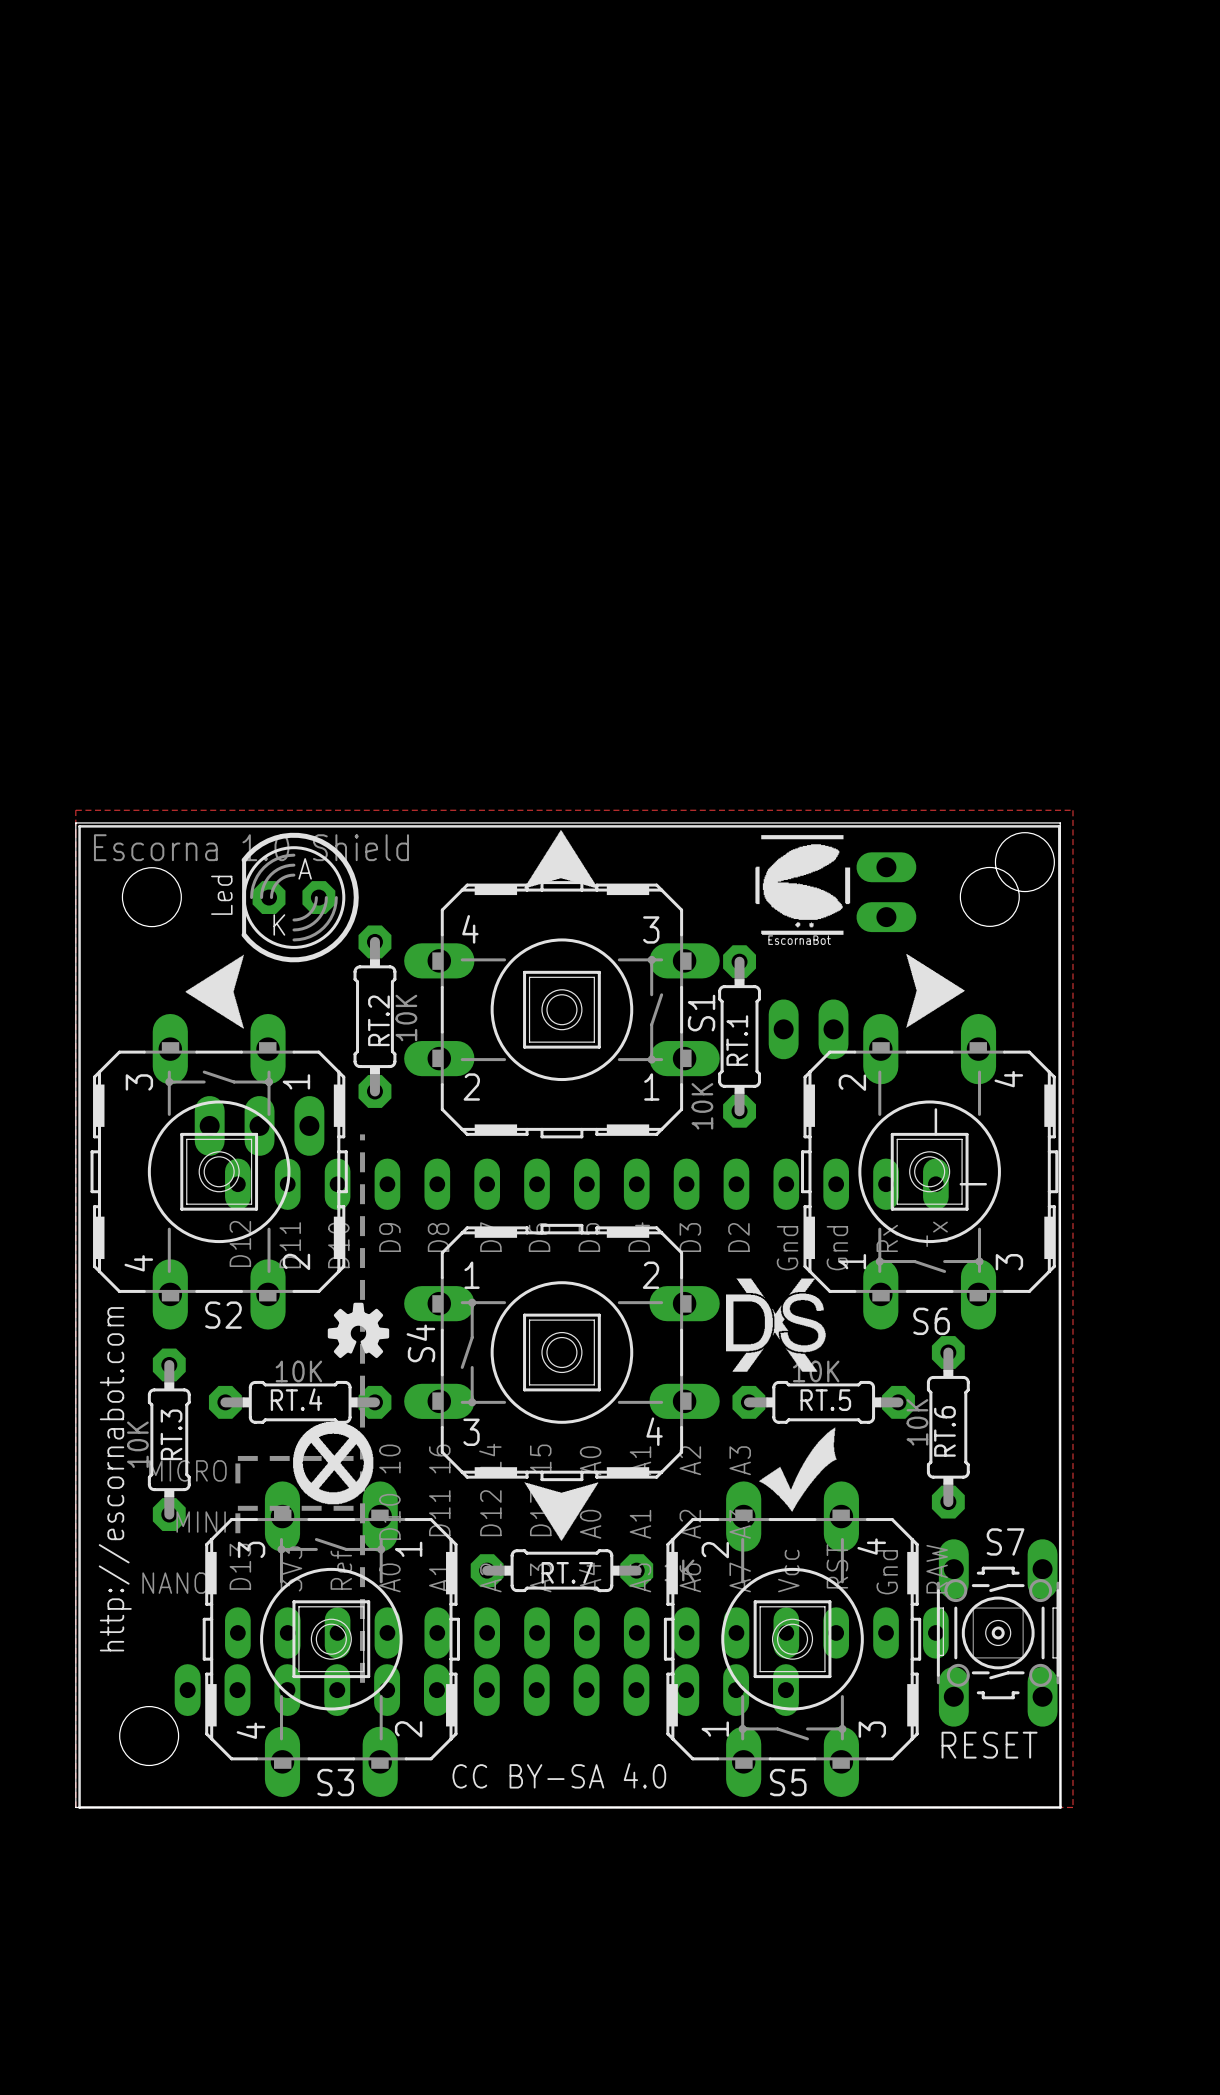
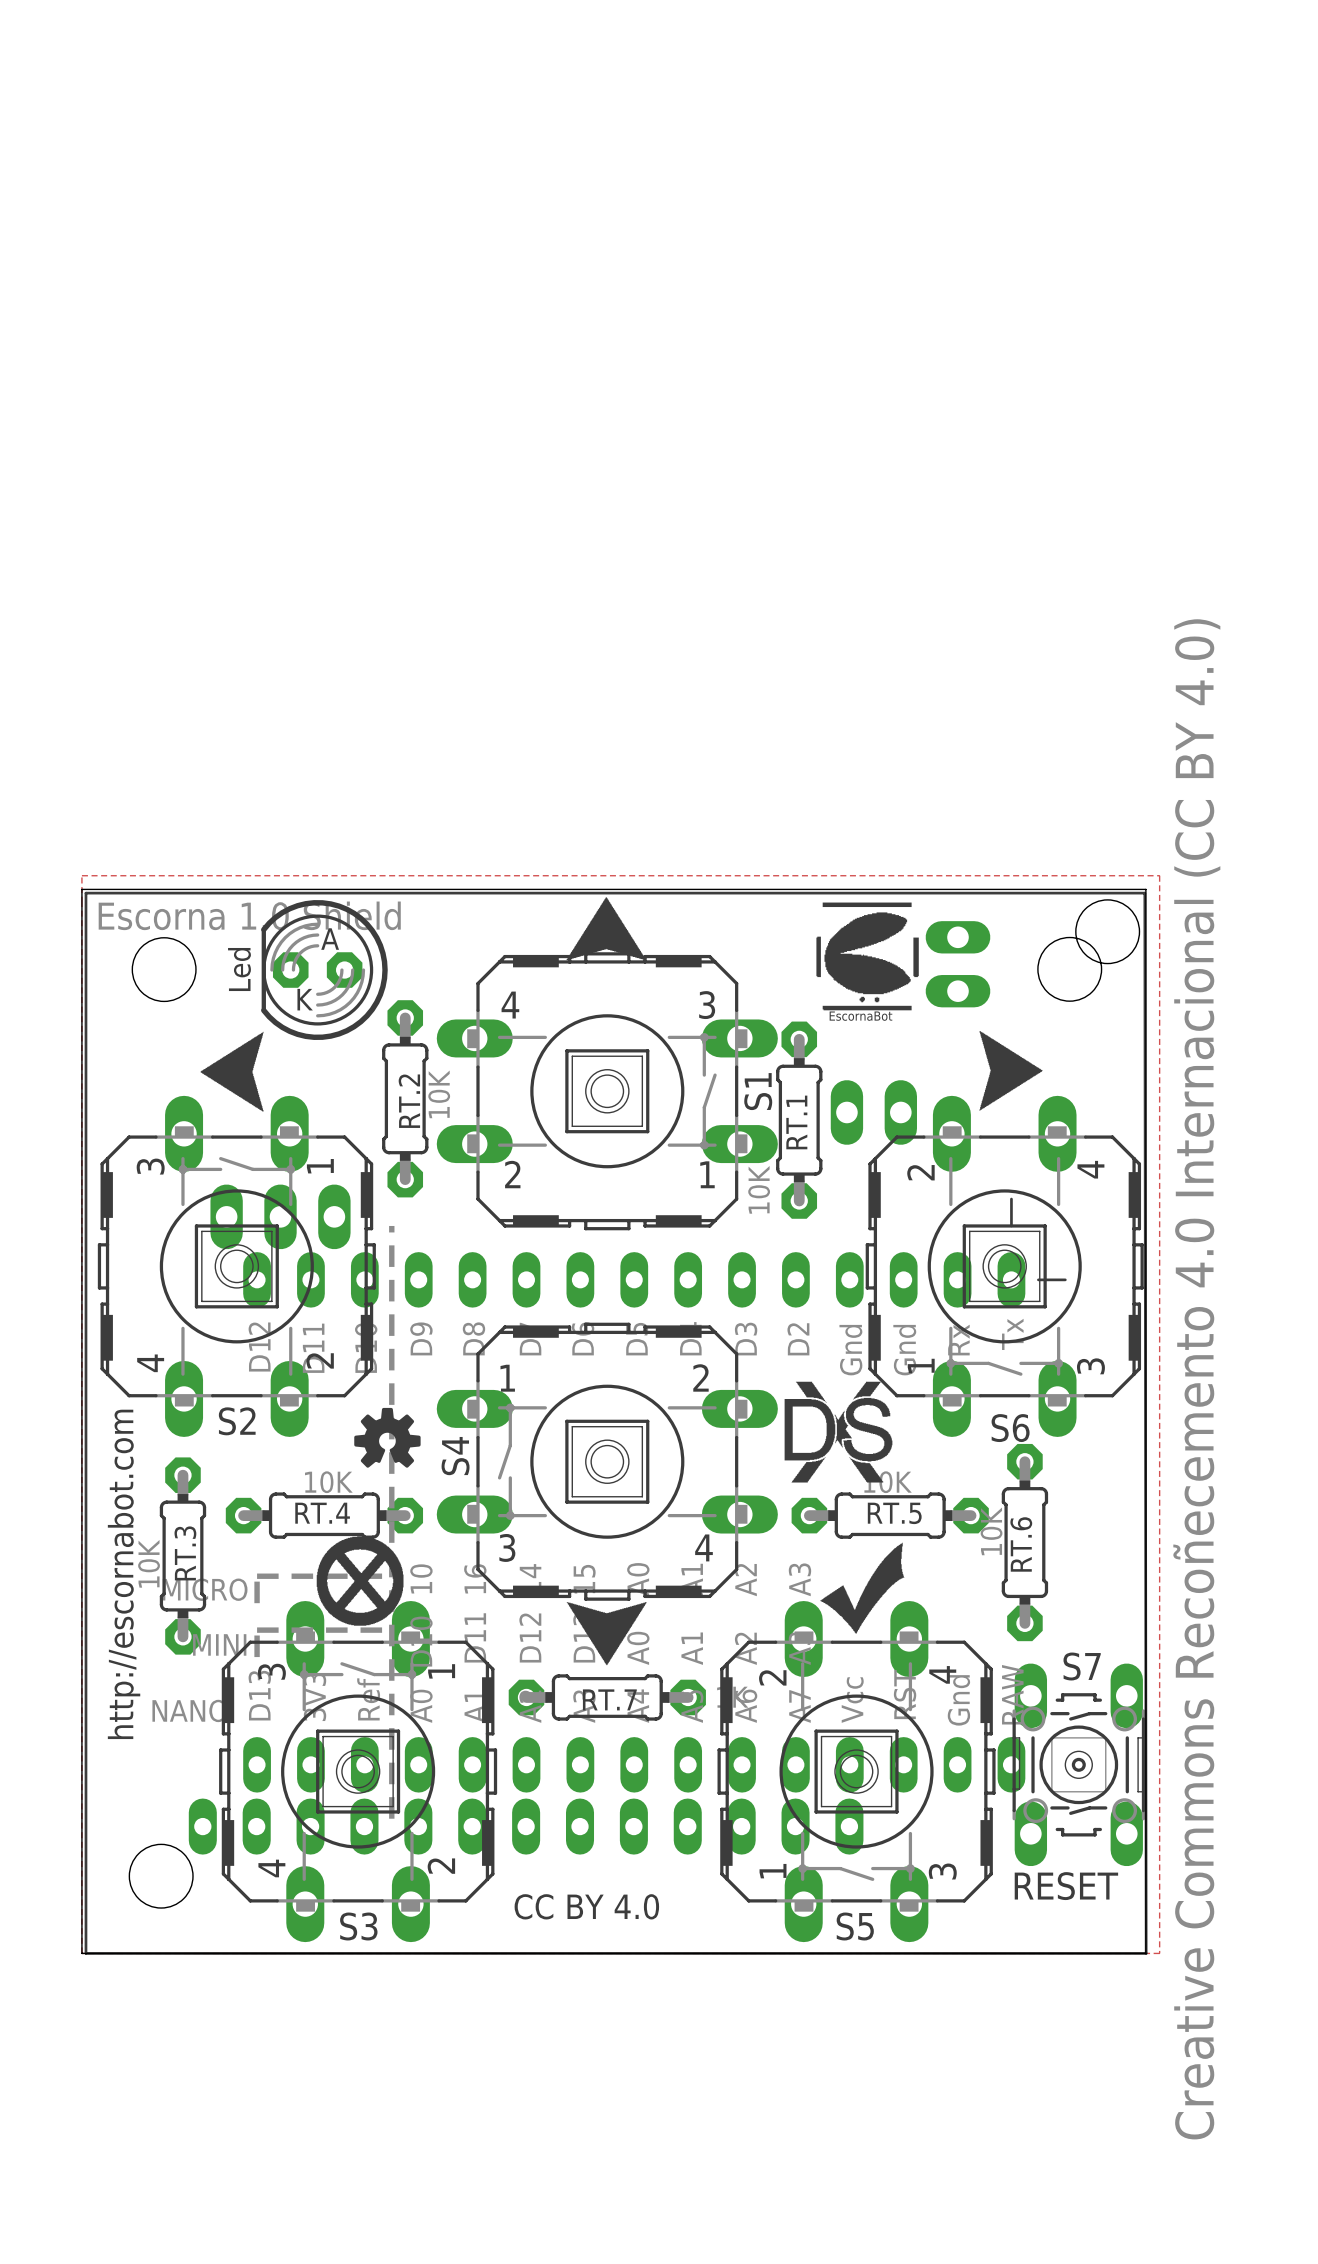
text: none -> Creative Commons Recoñecemento 4.0 Internacional (CC BY 4.0) (1196, 1379)
text: CC BY-SA 4.0 (559, 1775) -> CC BY 4.0 (586, 1906)

